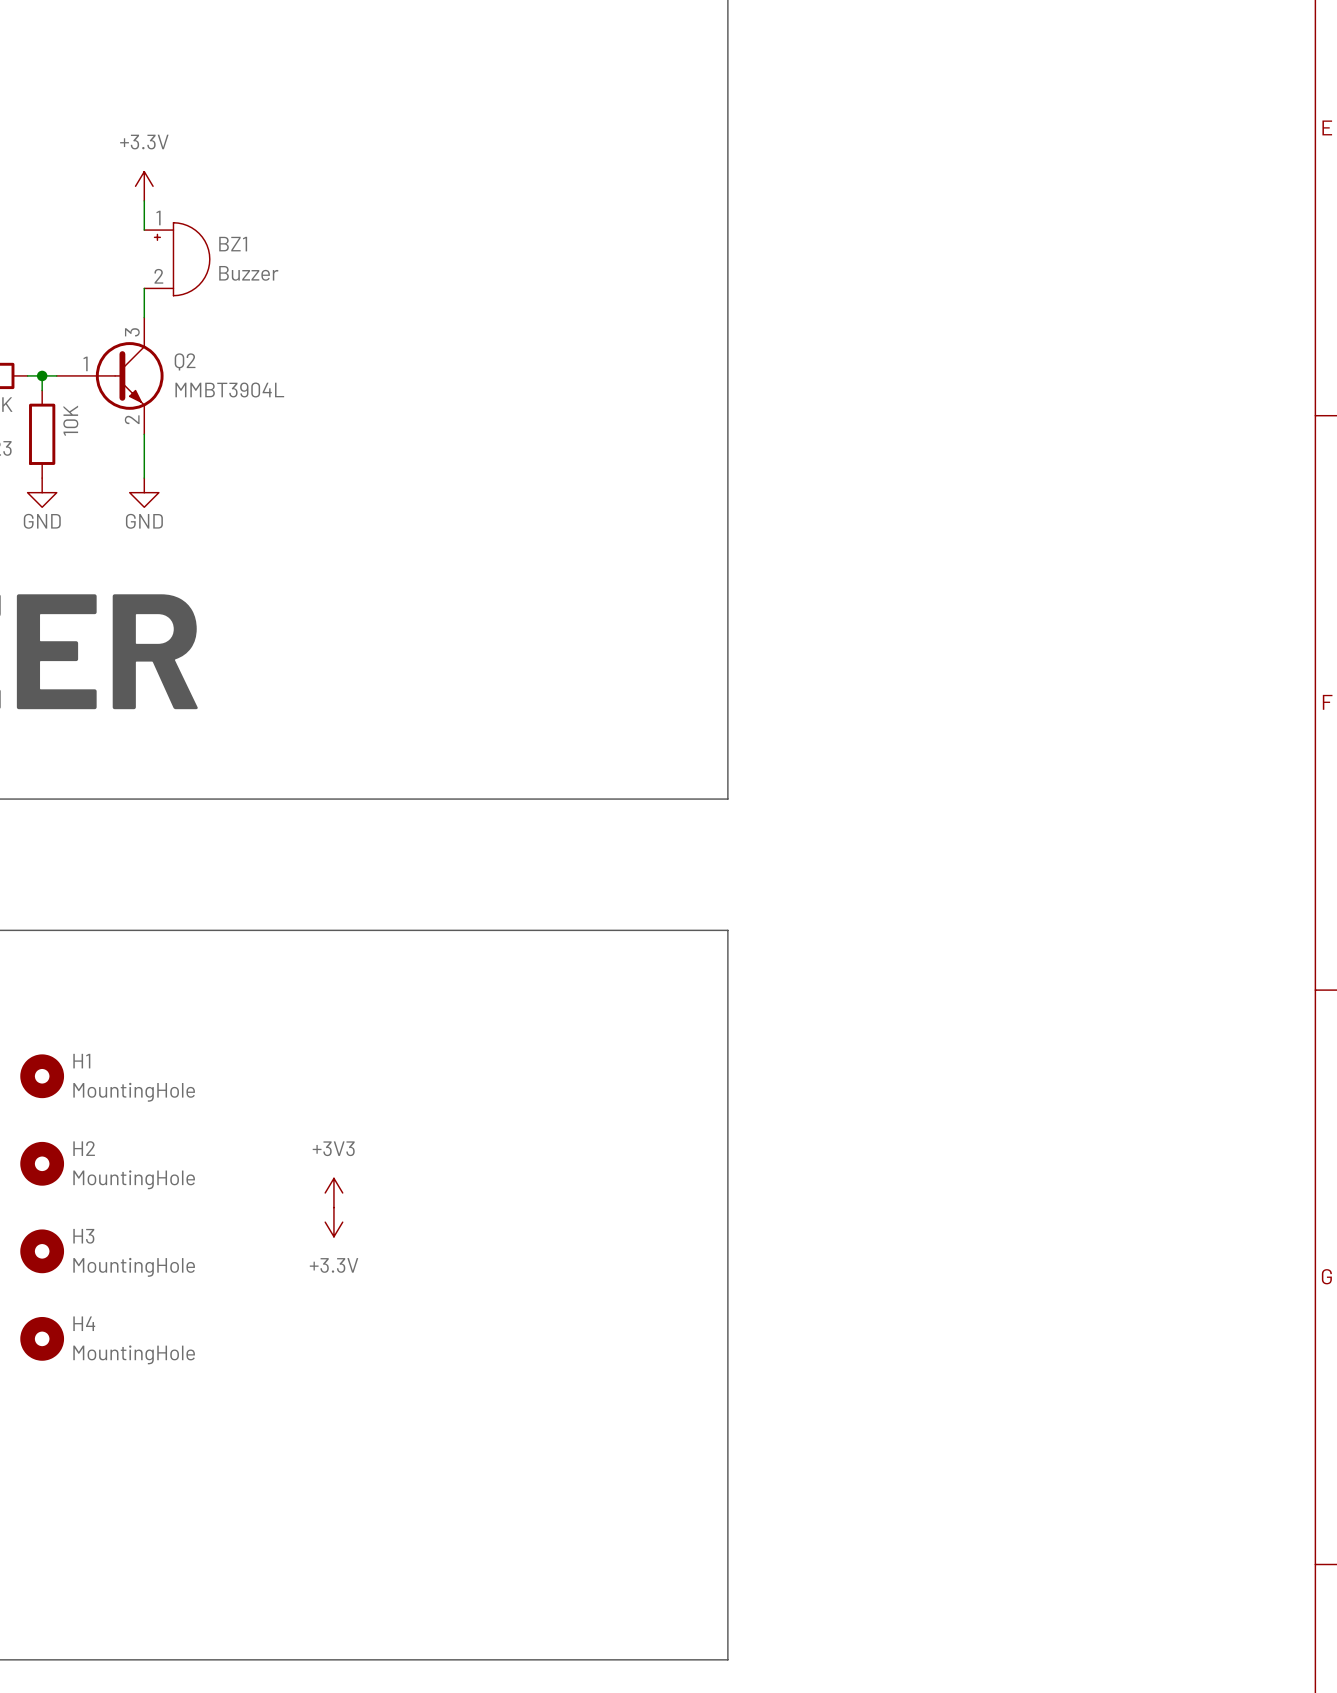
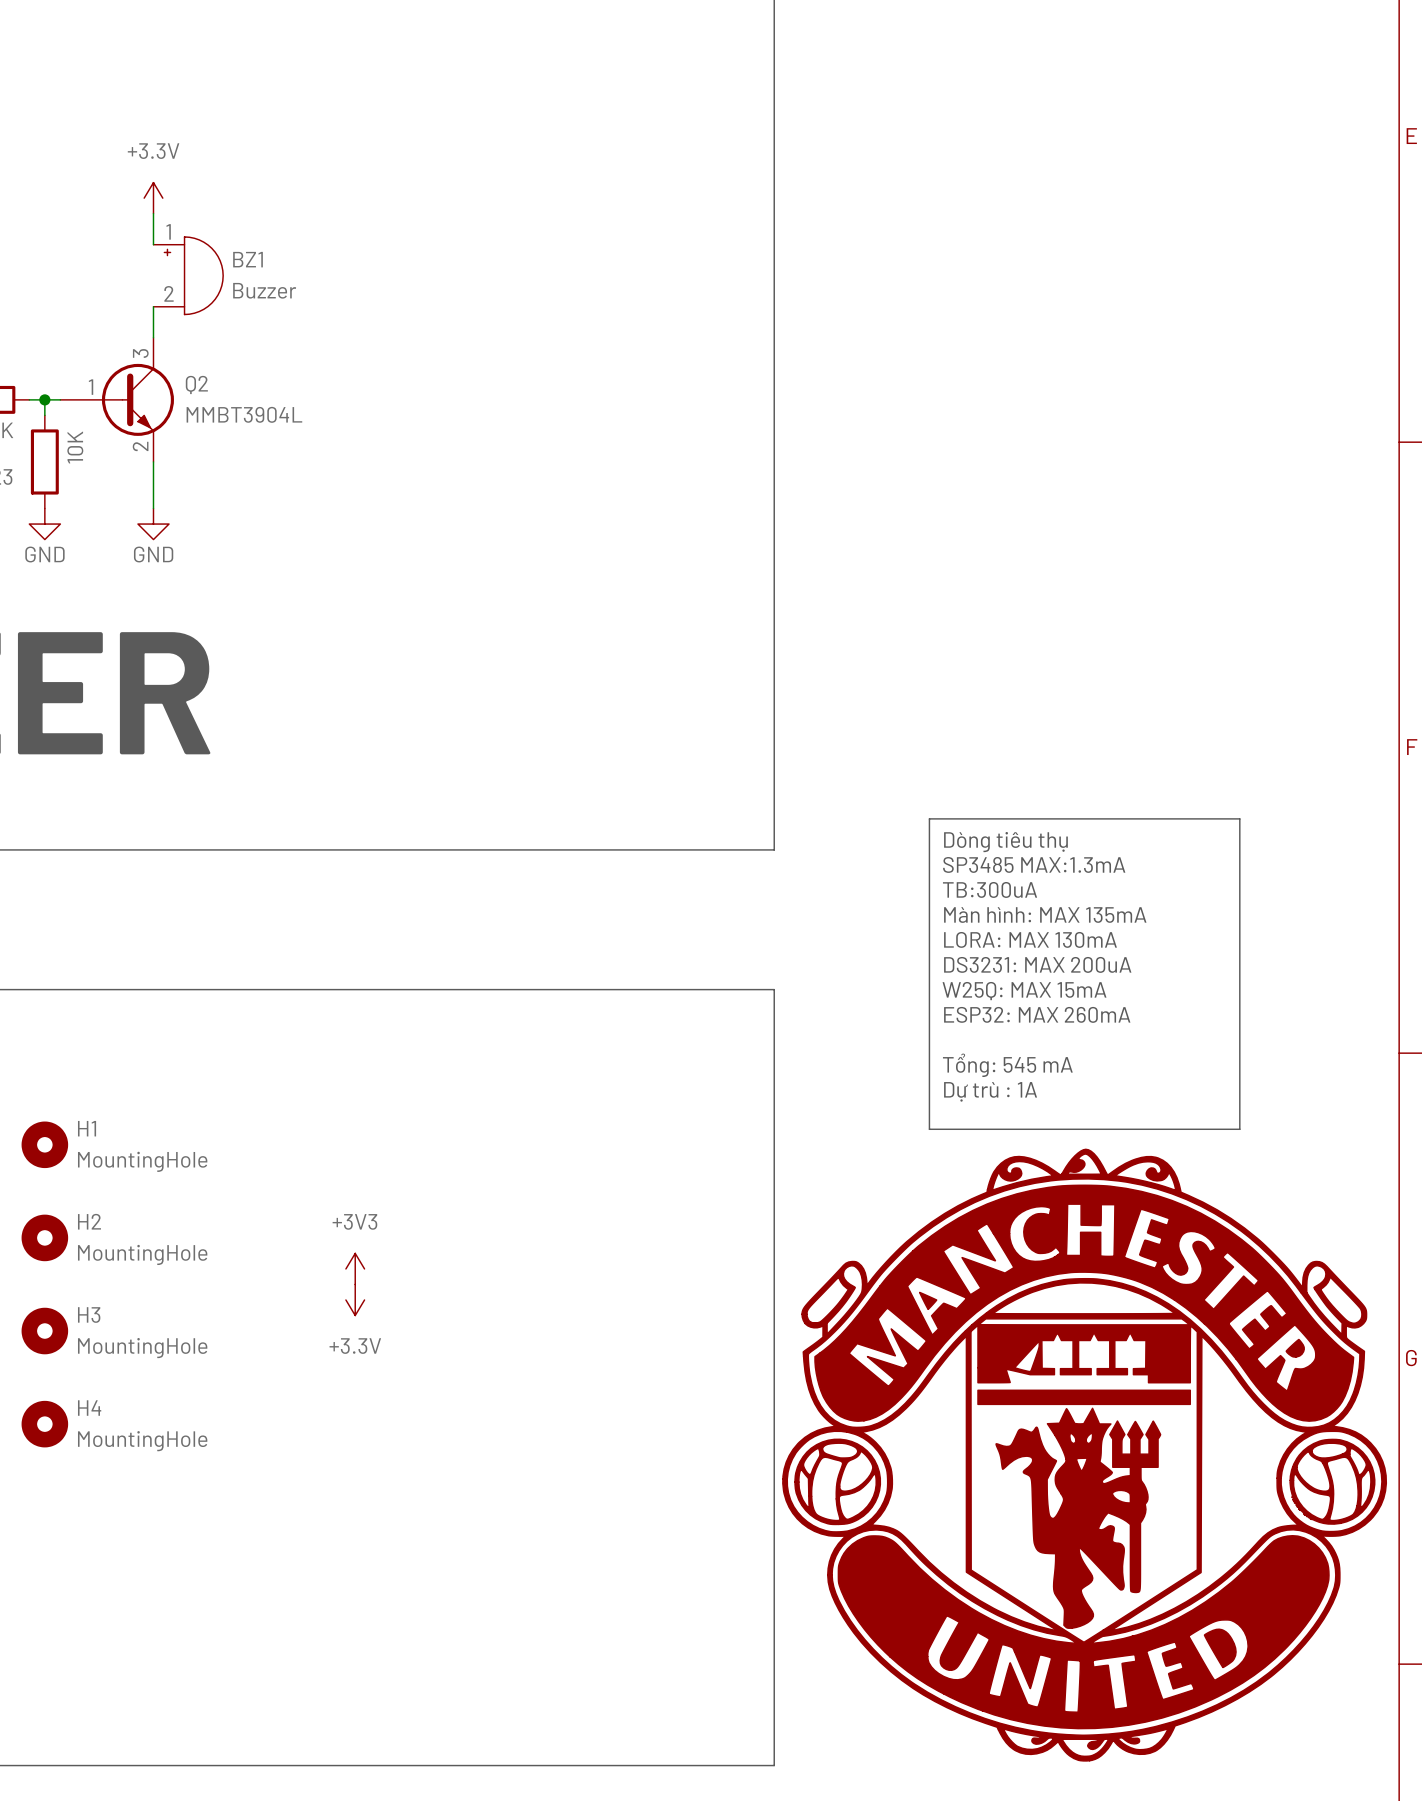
line: none -> (929, 818) (1239, 818) (1239, 1129) (929, 1129) (929, 818)
text: none -> Dòng tiêu thụ (1005, 842)
text: none -> SP3485 MAX:1.3mA (1034, 864)
text: none -> TB:300uA (990, 889)
text: none -> Màn hình: MAX 135mA (1045, 915)
text: none -> LORA: MAX 130mA (1030, 939)
text: none -> DS3231: MAX 200uA (1037, 964)
text: none -> W25Q: MAX 15mA (1024, 991)
text: none -> ESP32: MAX 260mA (1037, 1014)
text: none -> Tổng: 545 mA (1007, 1065)
text: none -> Dự trù : 1A (990, 1091)
part: none -> (1084, 1455)

